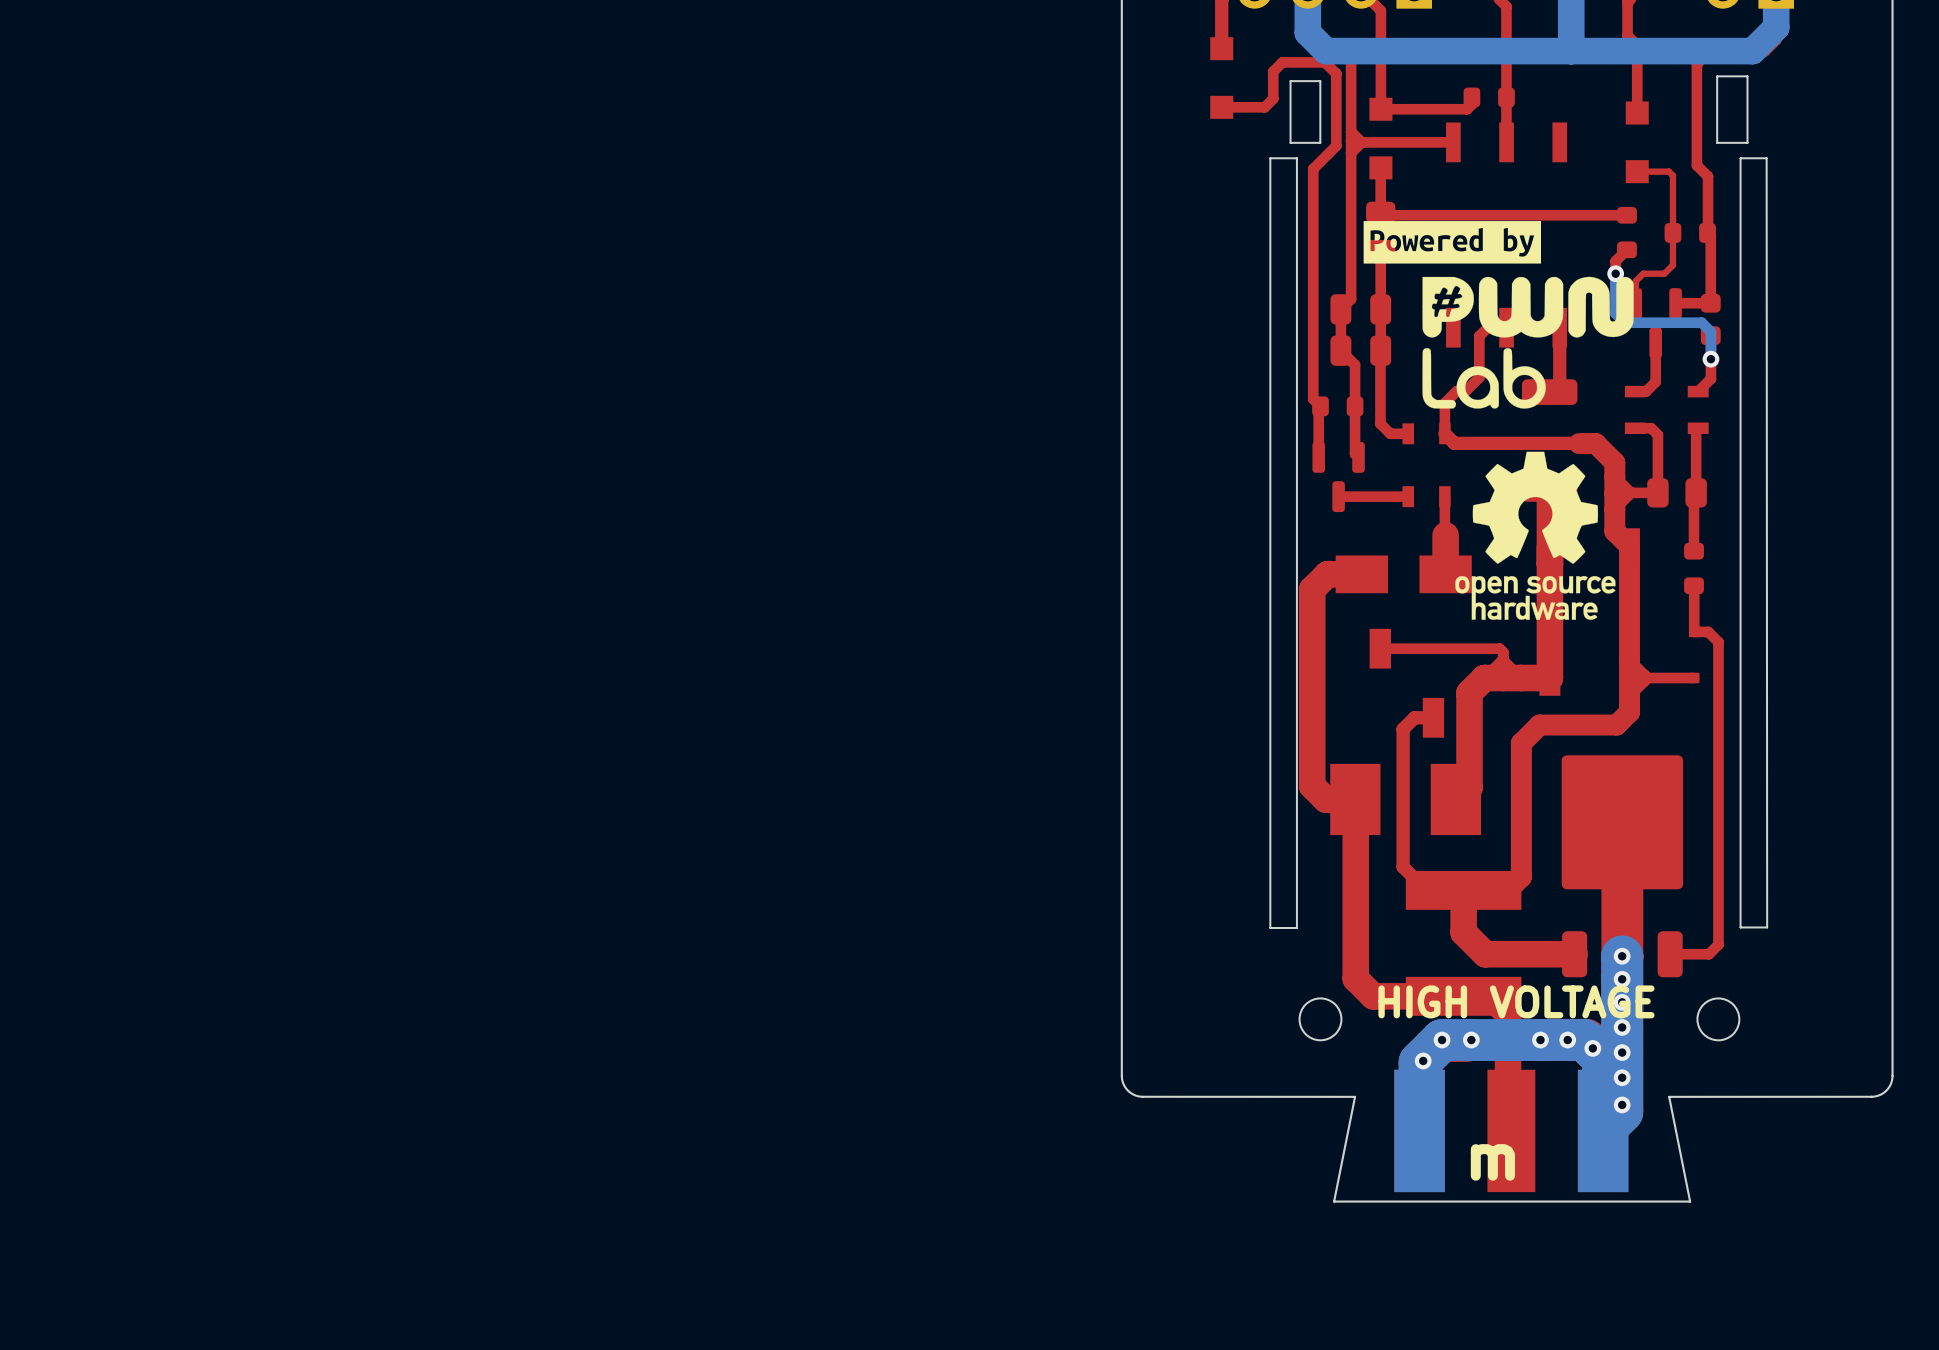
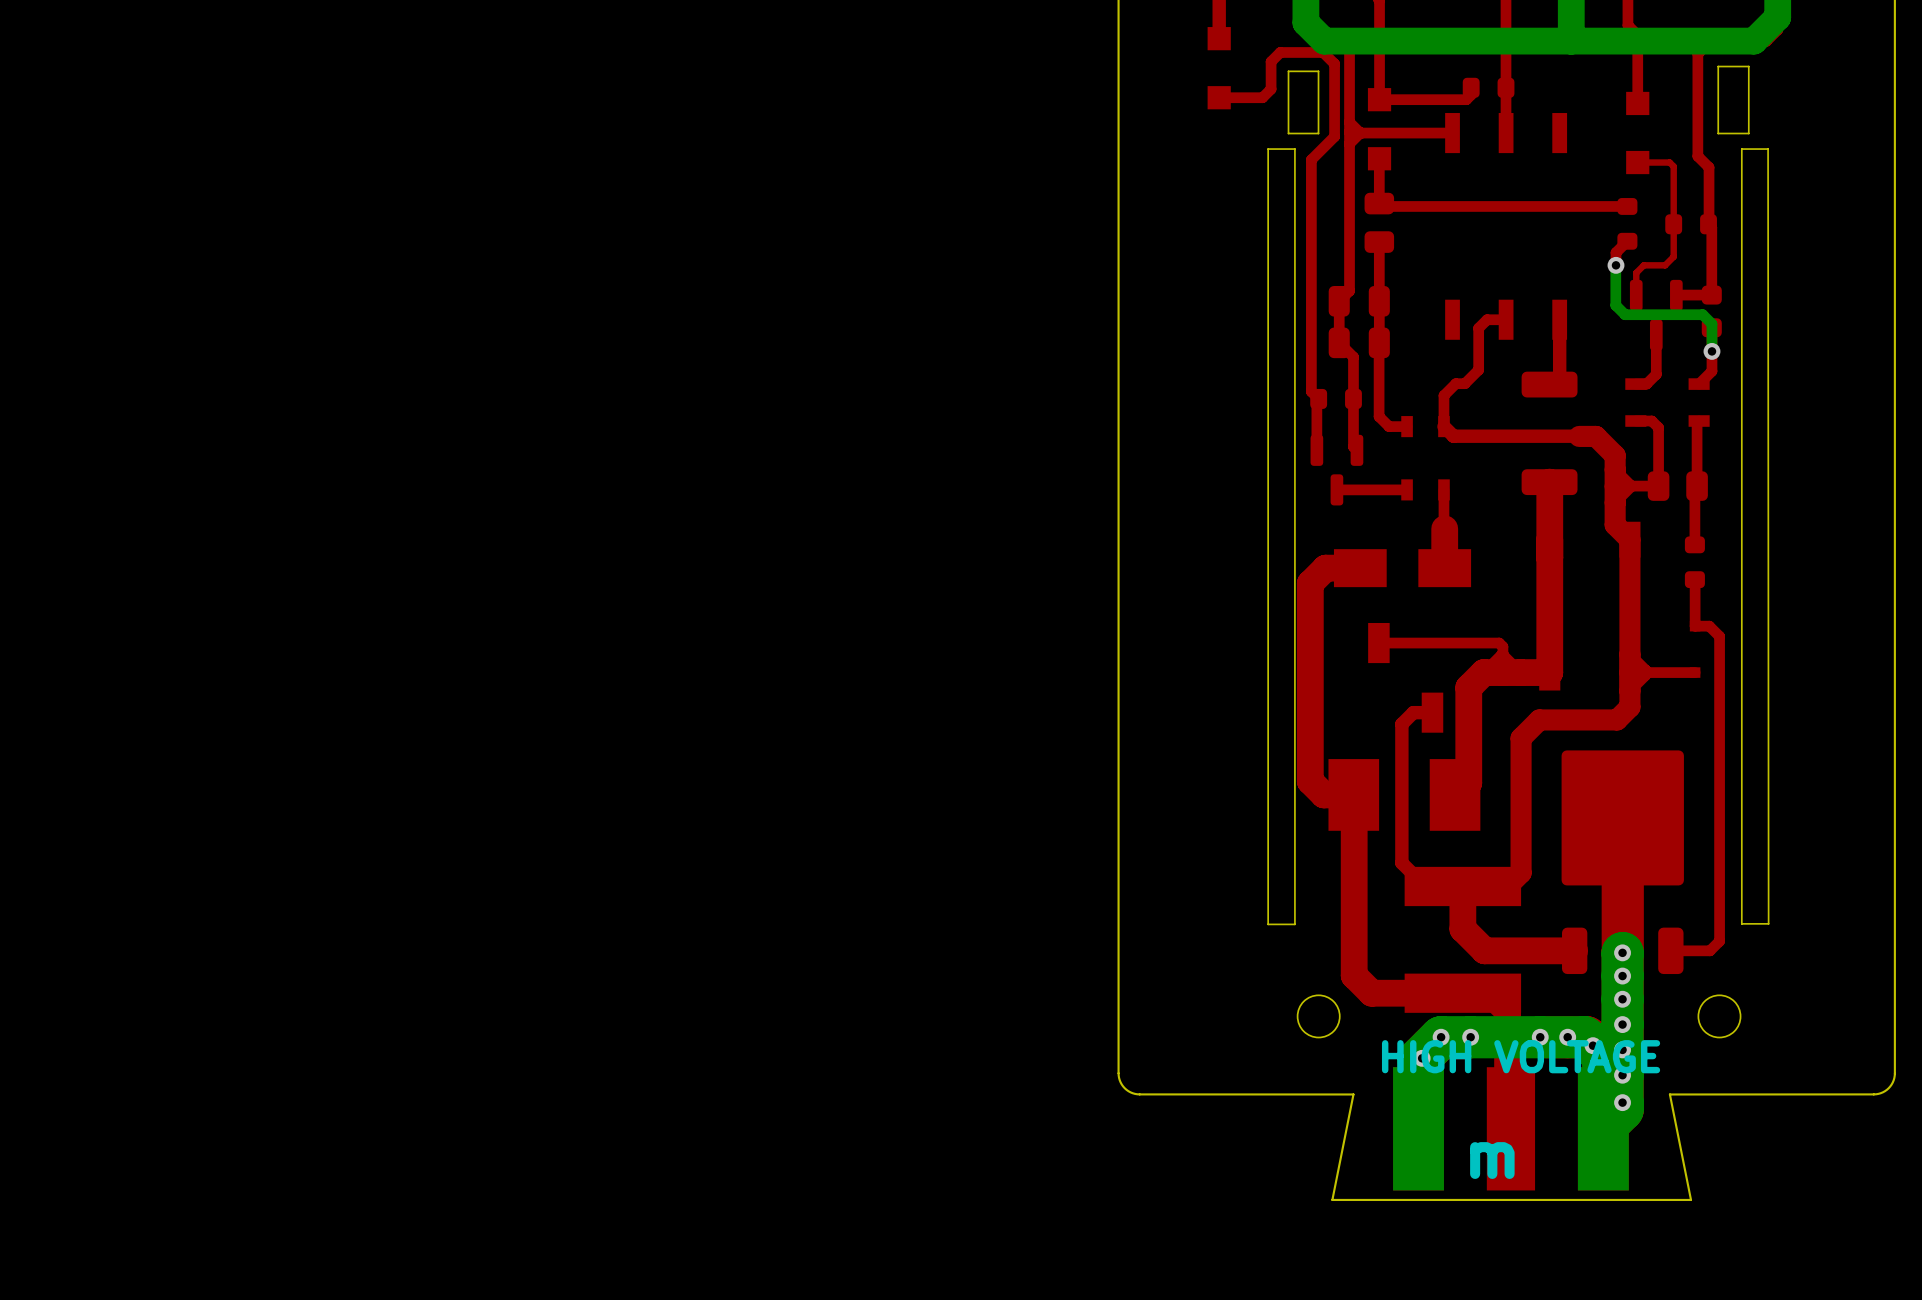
drawing: [1363, 221, 1634, 409] -> none
drawing: [1455, 451, 1616, 620] -> none
text position: HIGH VOLTAGE (1516, 1001) -> HIGH VOLTAGE (1521, 1056)

